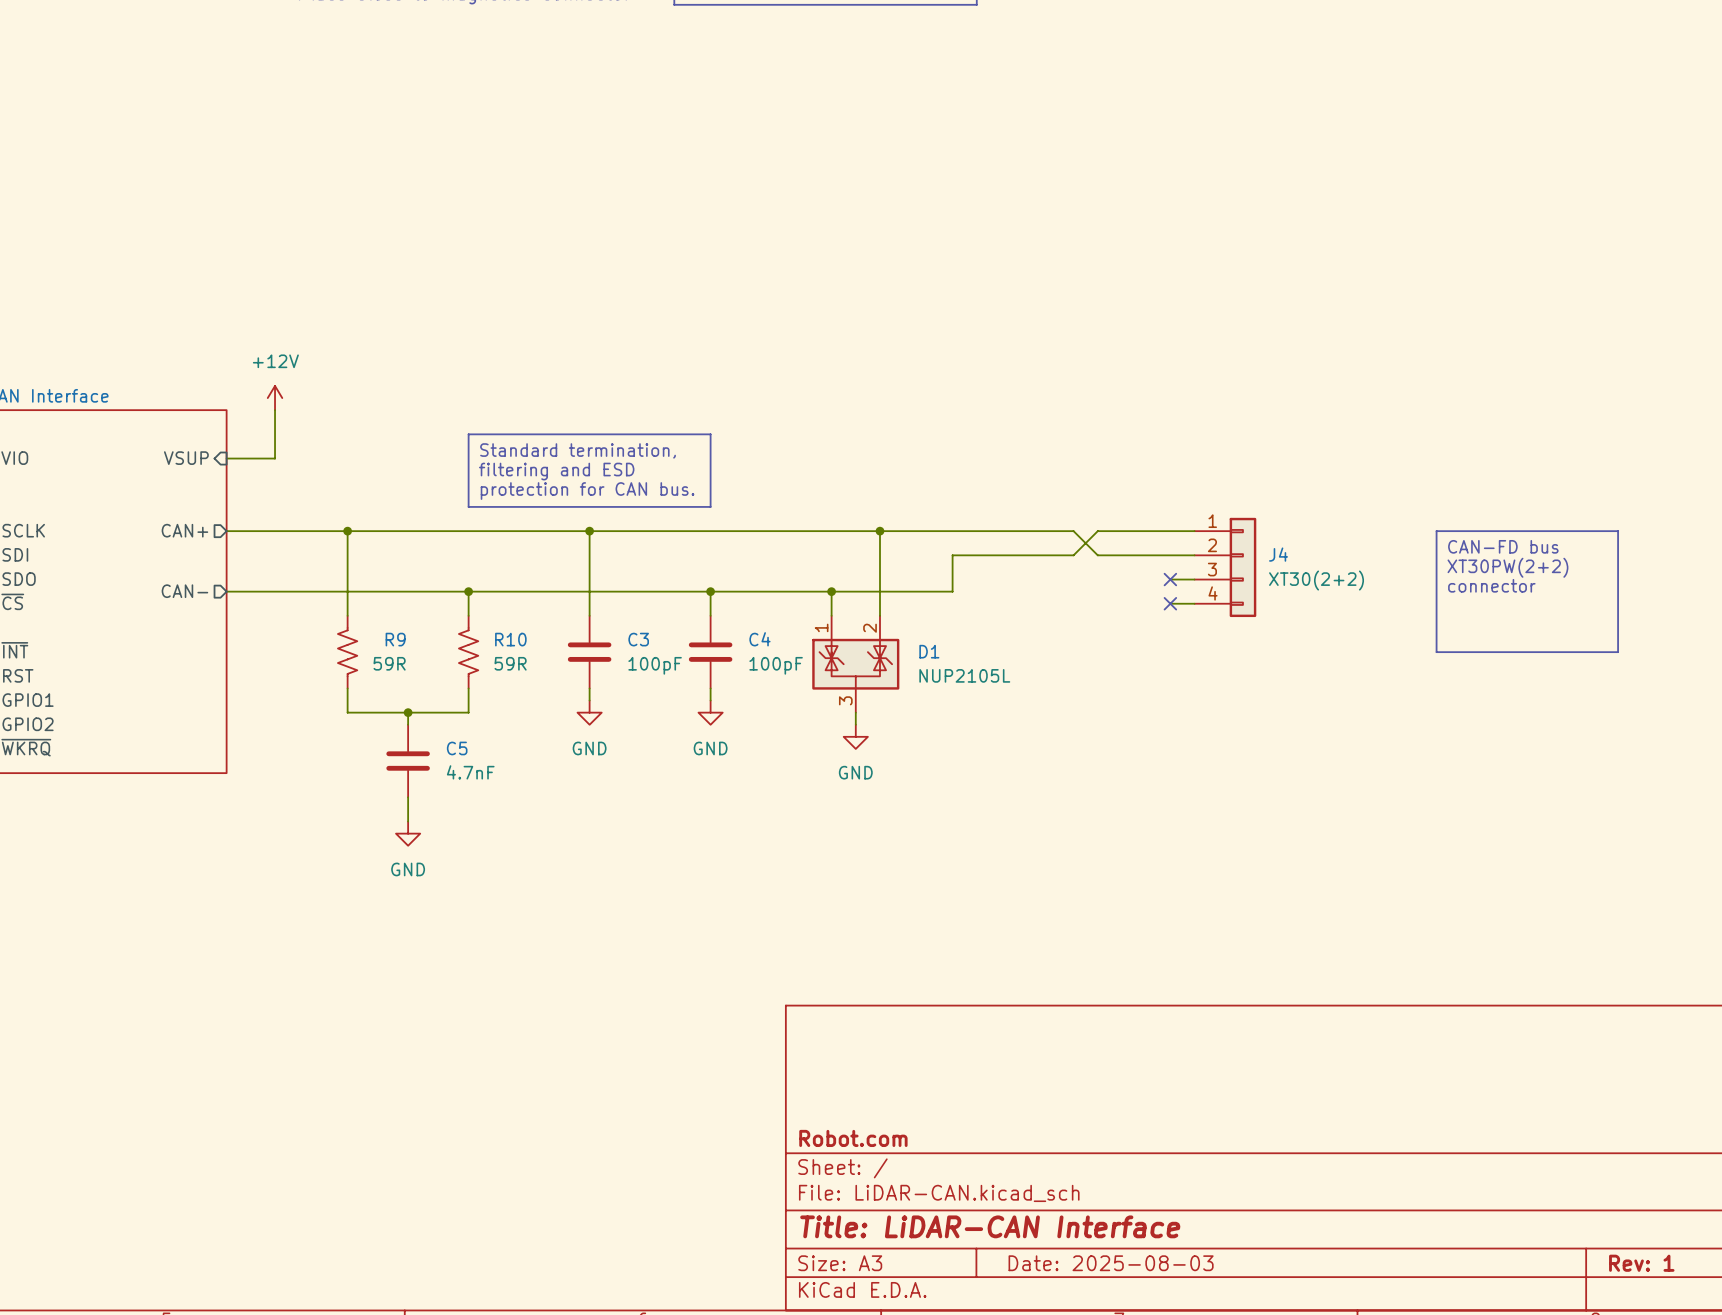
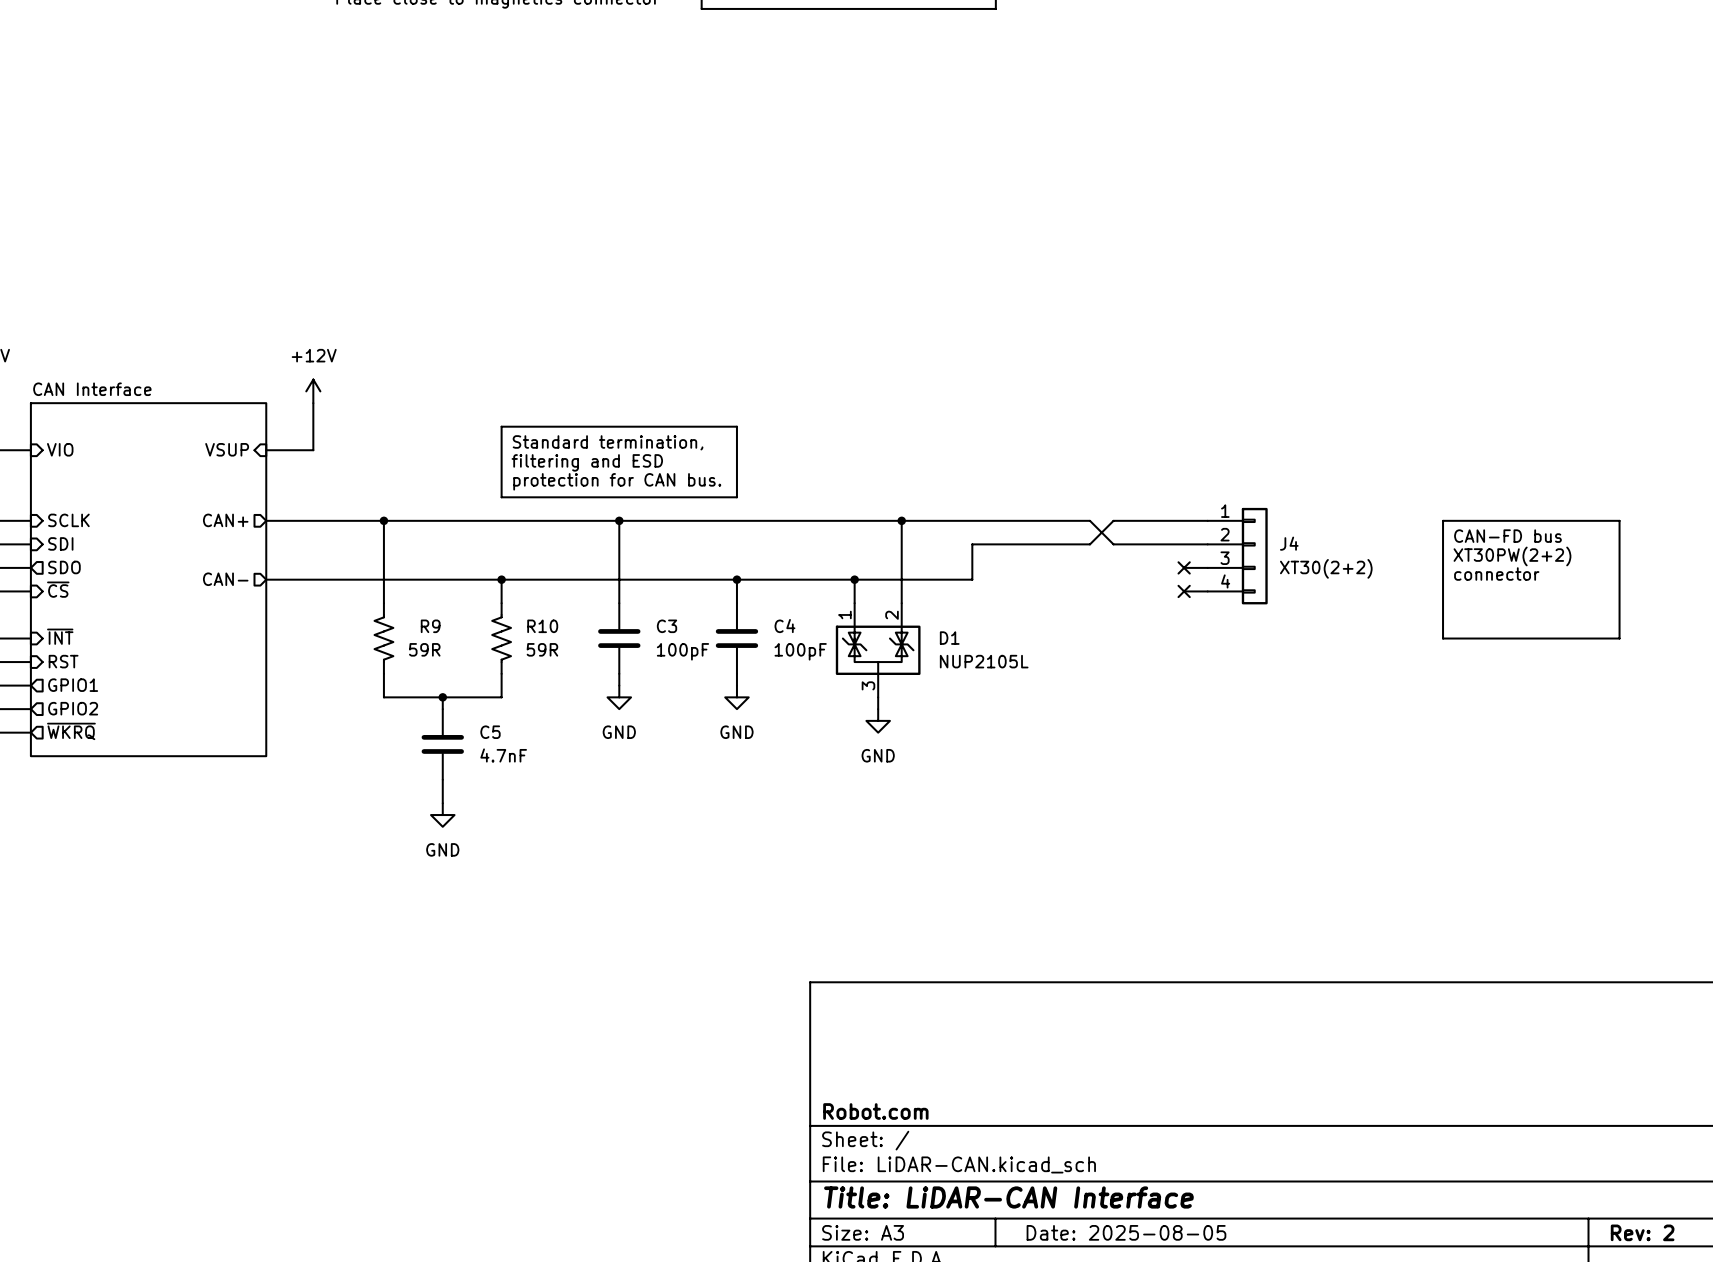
title block: Date: 2025-08-03 (1111, 1263) -> Date: 2025-08-05 (1126, 1232)
title block: Rev: 1 (1641, 1263) -> Rev: 2 (1642, 1232)

